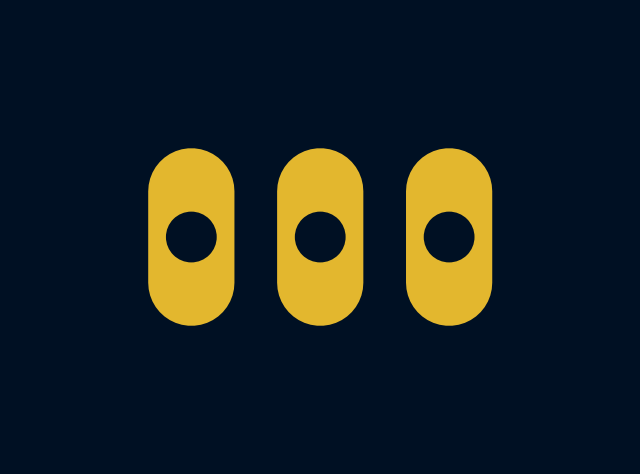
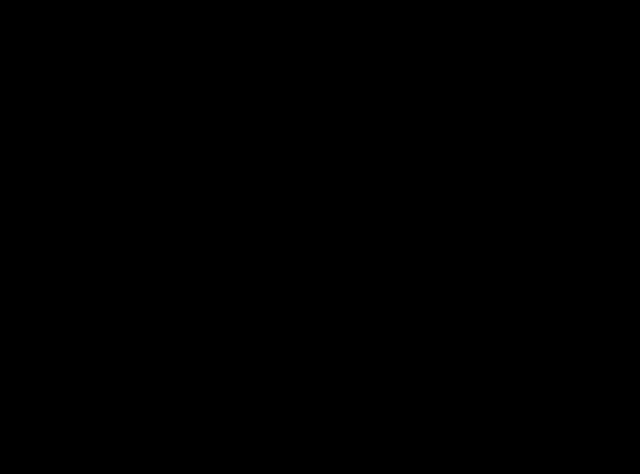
part: (320, 237) -> none

